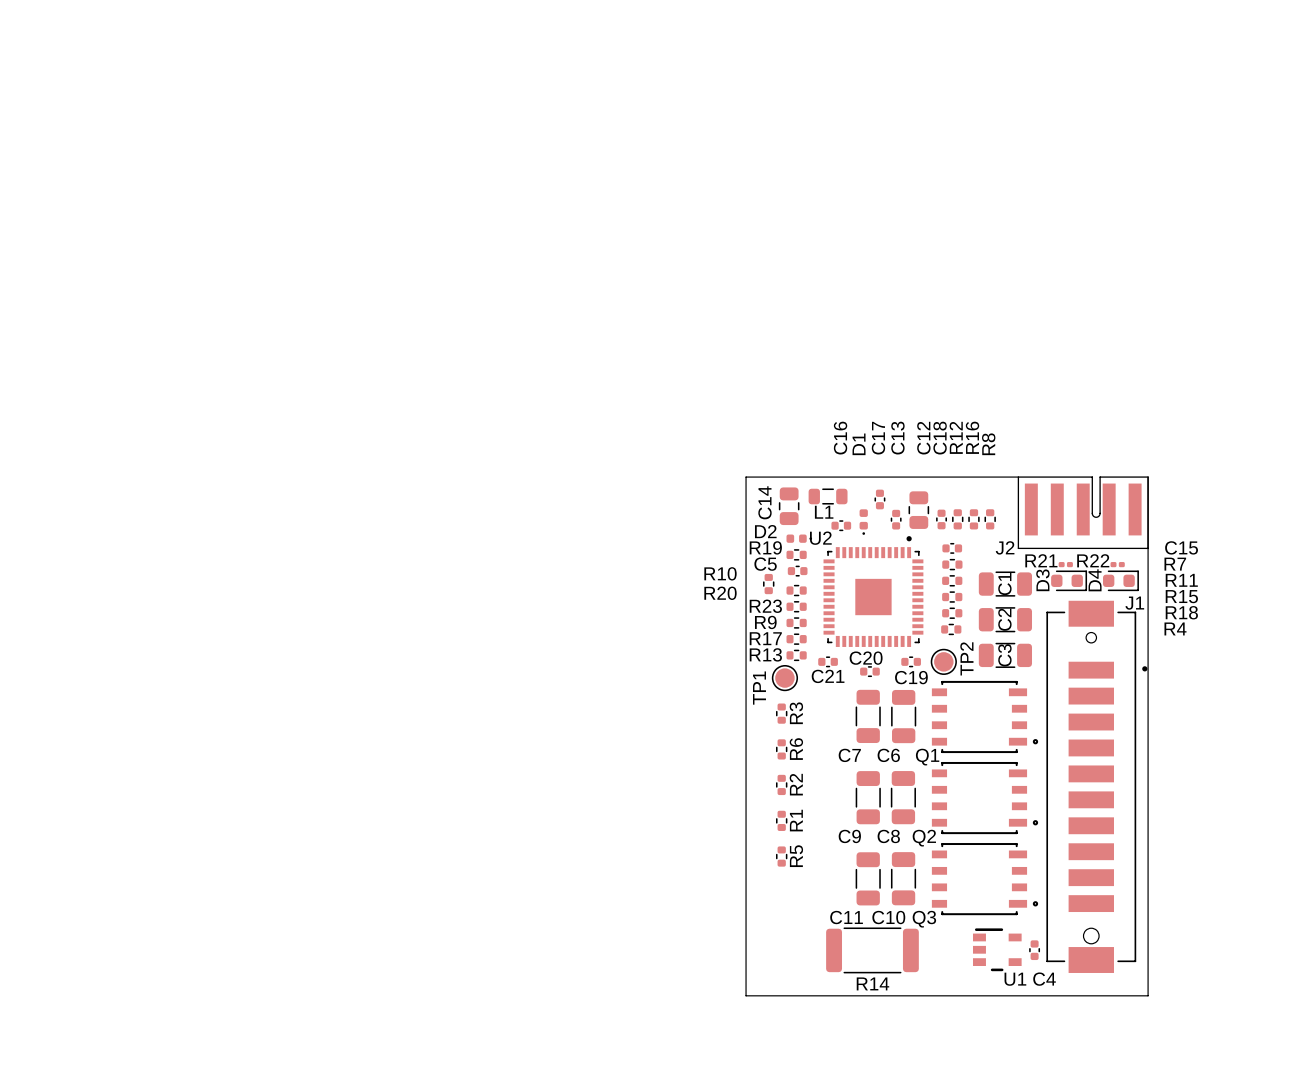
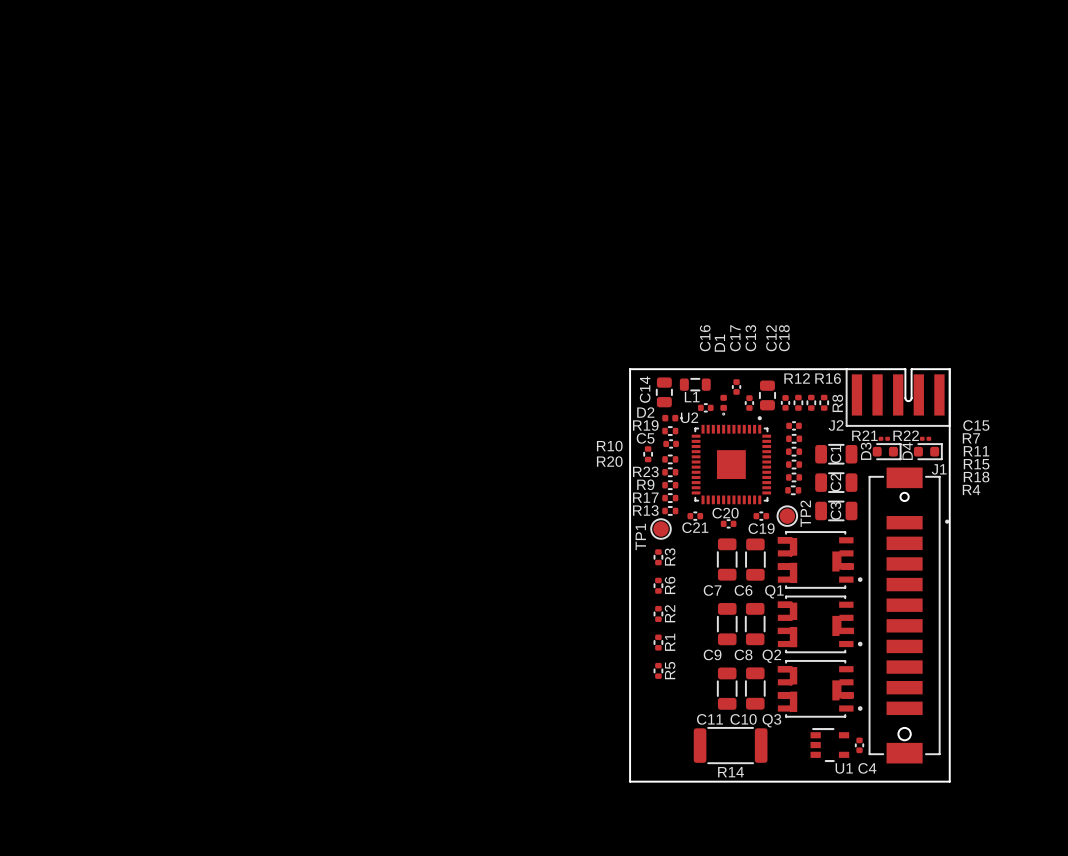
R12 name rotation: 0° (956, 437) -> 90° clockwise (797, 378)
R12 name position: R12 (956, 437) -> R12 (797, 378)
R16 name rotation: 0° (972, 437) -> 90° clockwise (828, 378)
R16 name position: R16 (972, 437) -> R16 (828, 378)
R8 name position: R8 (988, 444) -> R8 (837, 403)
Q1 footprint: [931, 680, 1039, 754] -> [777, 531, 863, 589]
Q2 footprint: [931, 761, 1039, 835] -> [777, 595, 863, 654]
Q3 footprint: [931, 843, 1039, 916] -> [777, 660, 863, 718]

